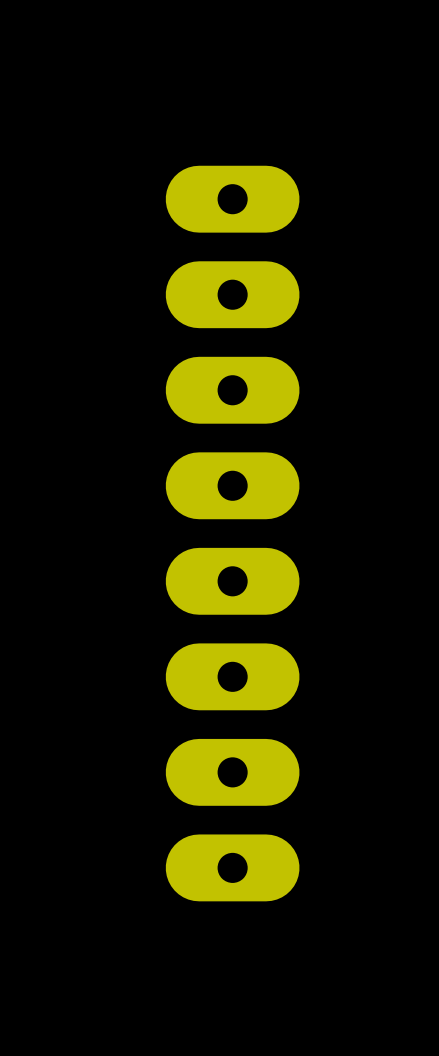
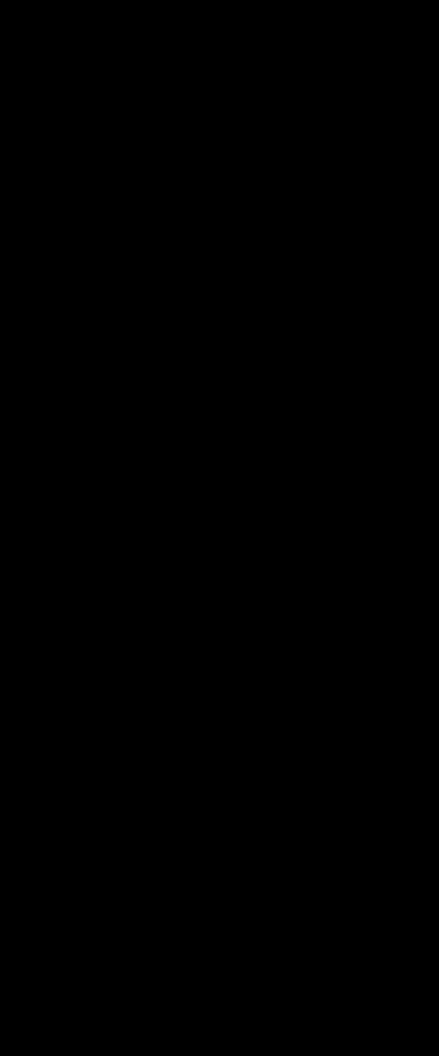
part: (232, 533) -> none

